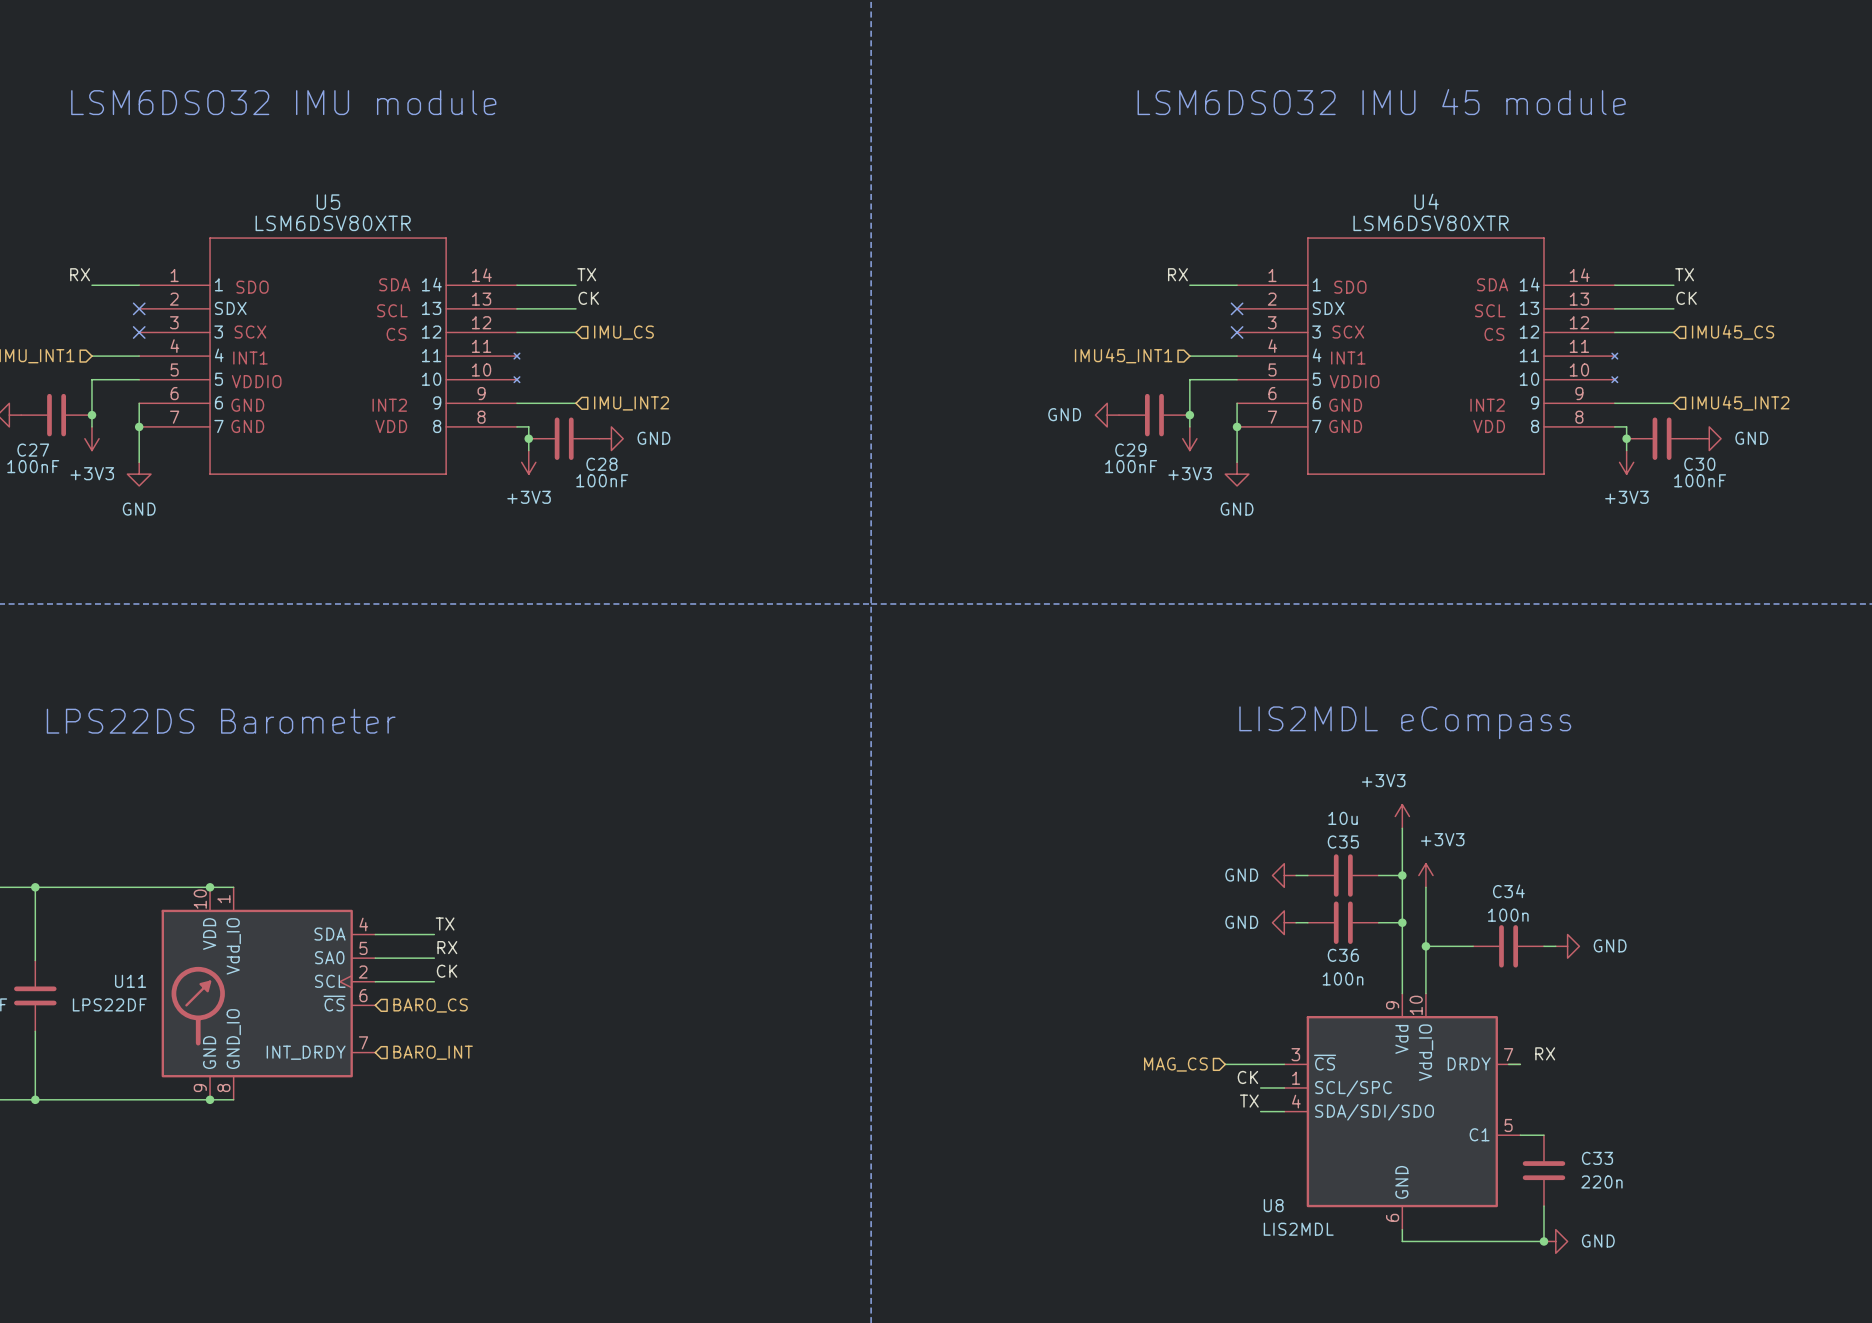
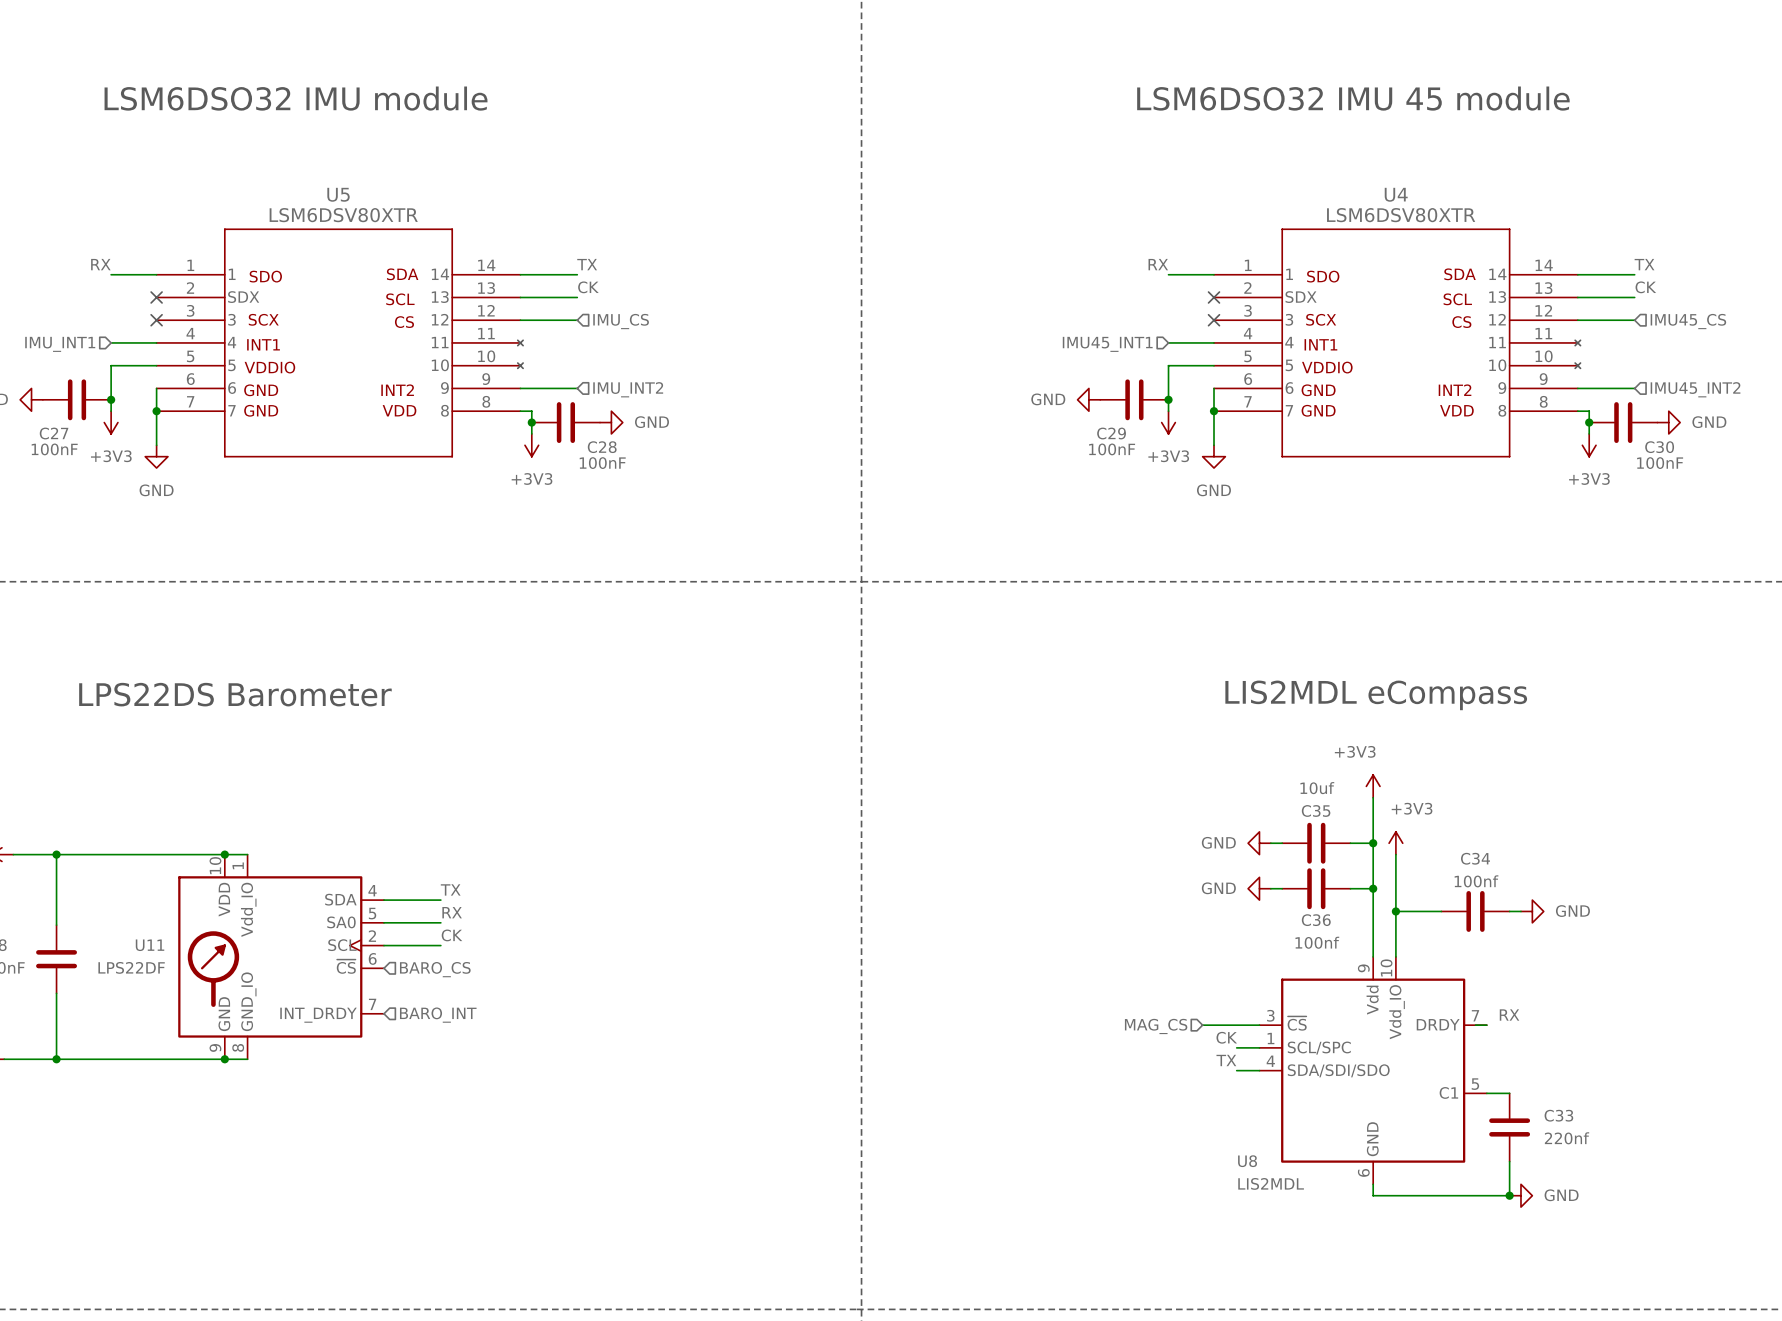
C35 value: 10u (1343, 818) -> 10uf (1317, 788)
C34 value: 100n (1508, 915) -> 100nf (1476, 881)
C36 value: 100n (1343, 978) -> 100nf (1317, 942)
C33 value: 220n (1601, 1181) -> 220nf (1567, 1138)

